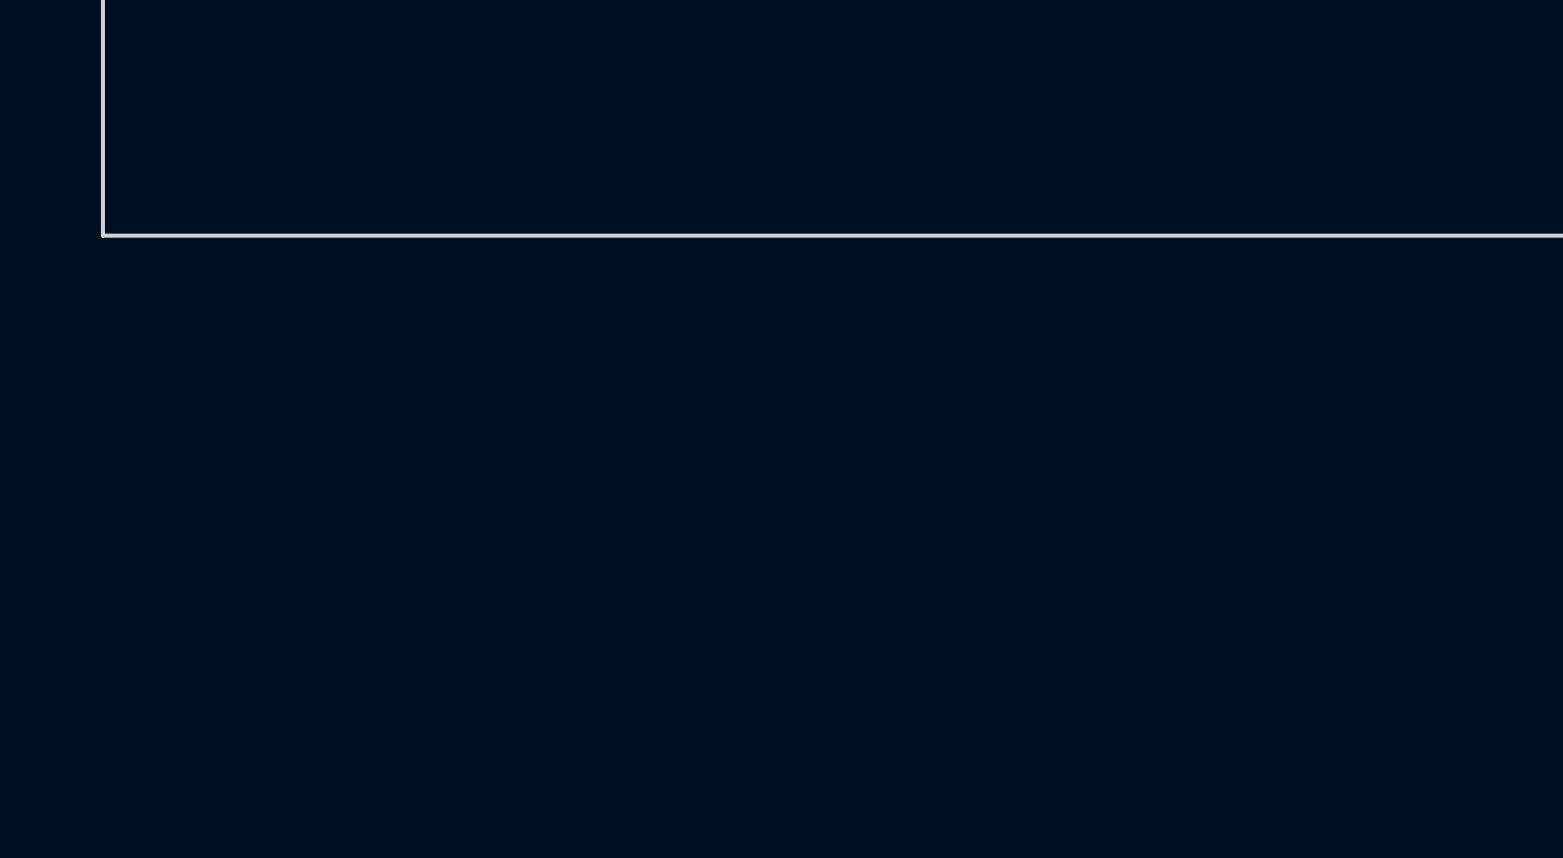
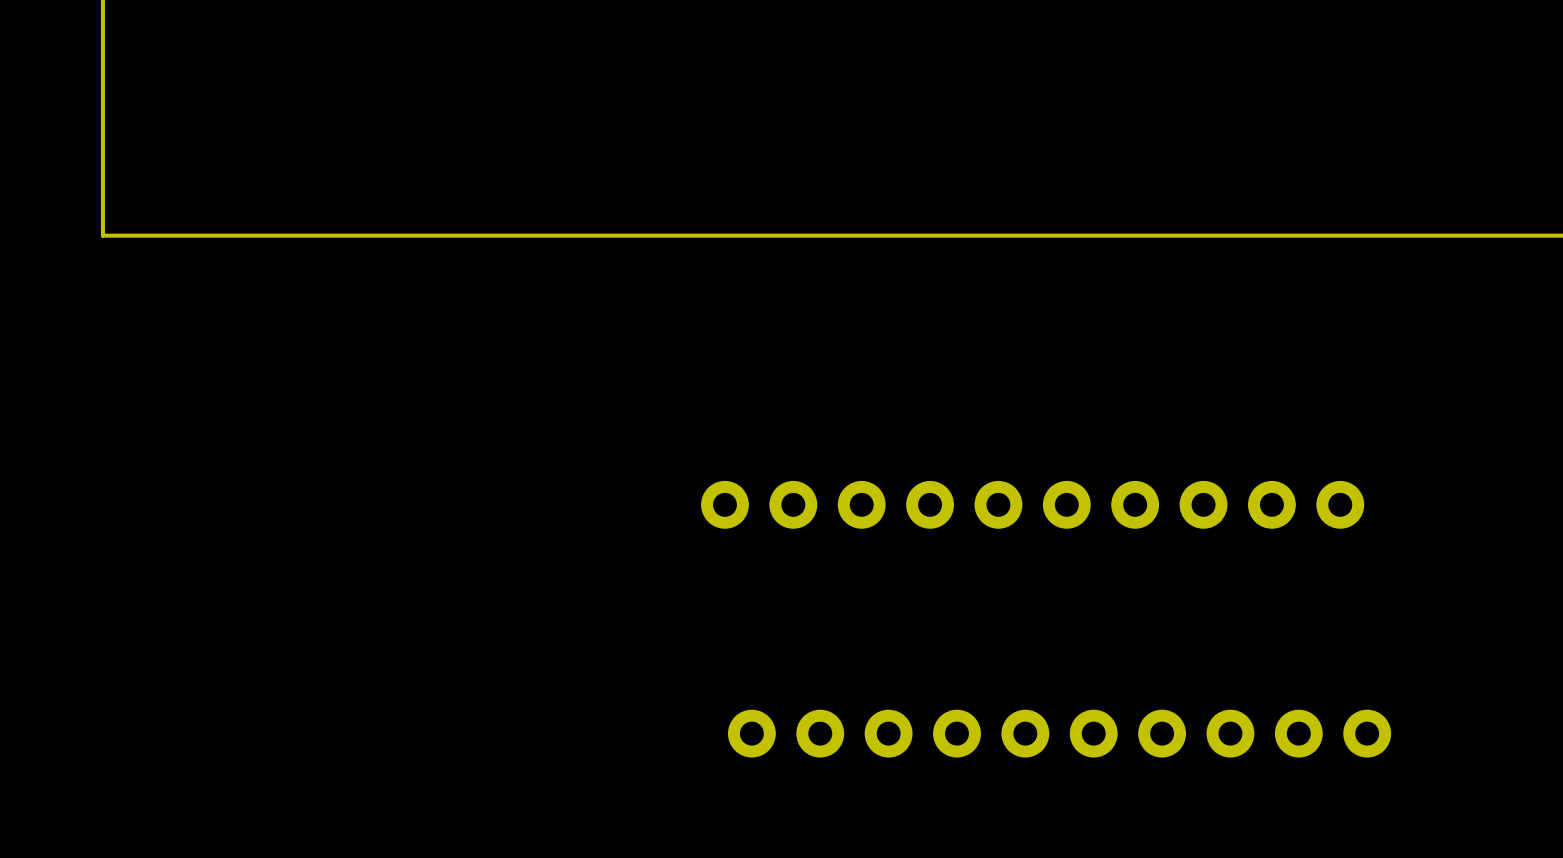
part: none -> (1032, 504)
part: none -> (1059, 733)

